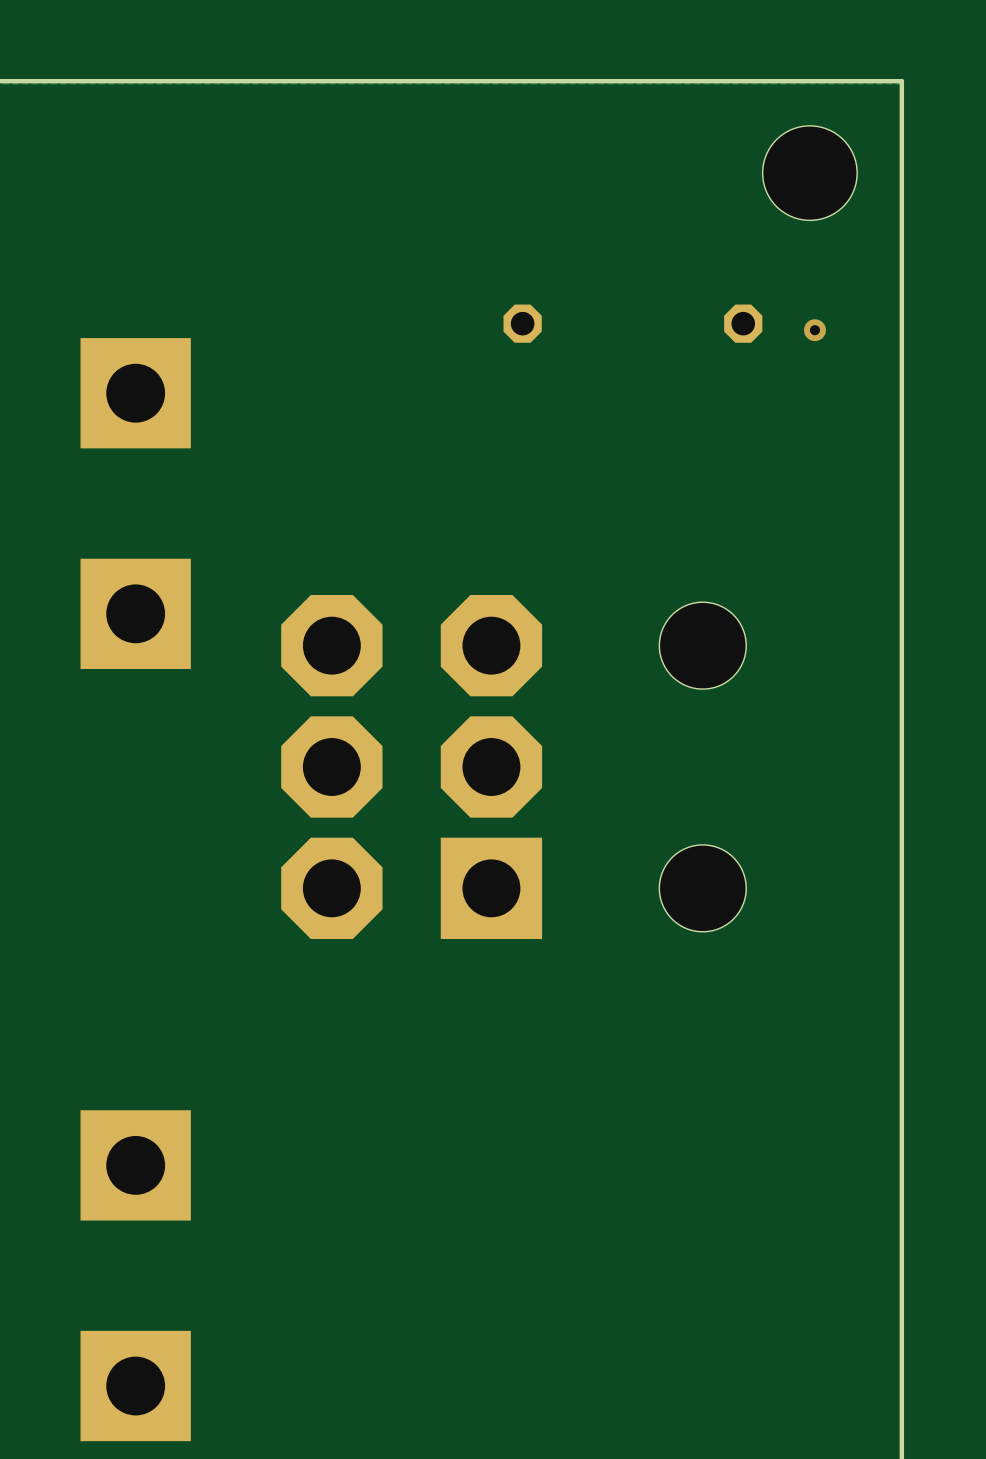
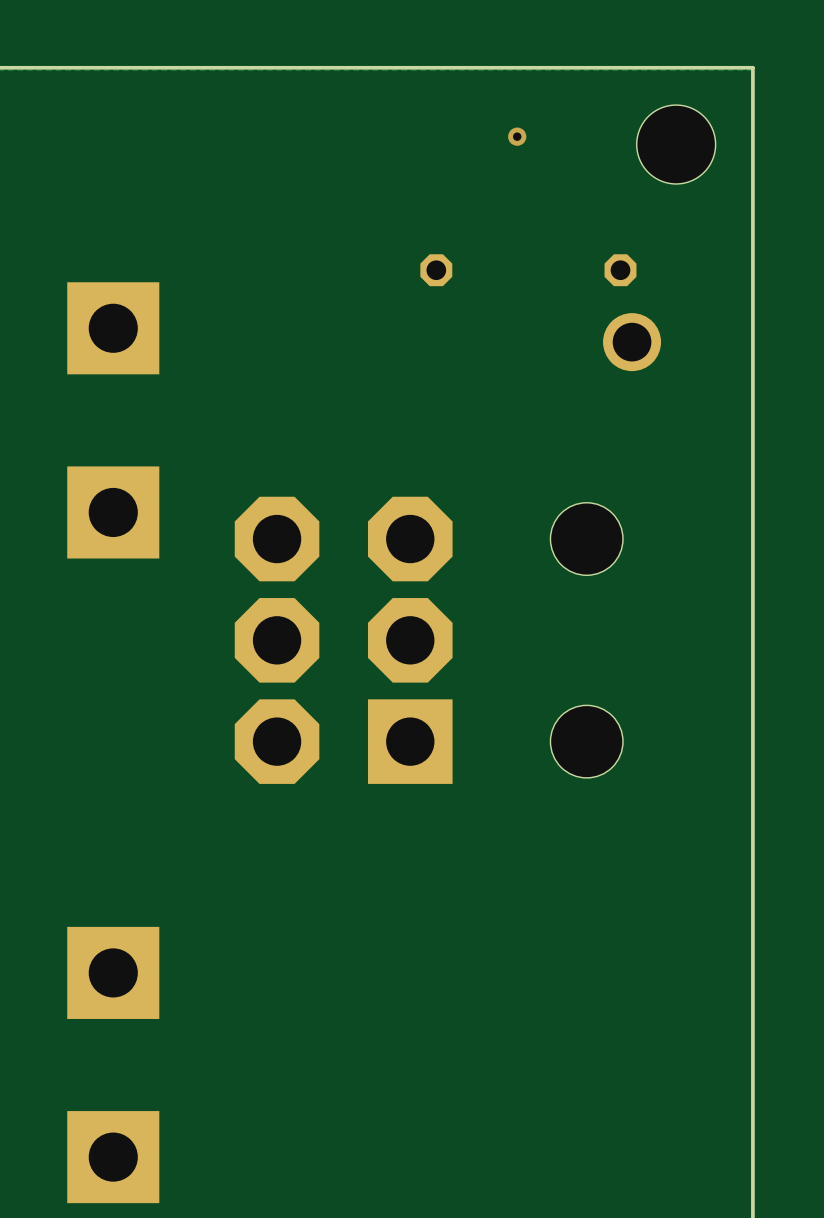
via: none -> (517, 136)
via: (814, 330) -> none
part: none -> (632, 342)

